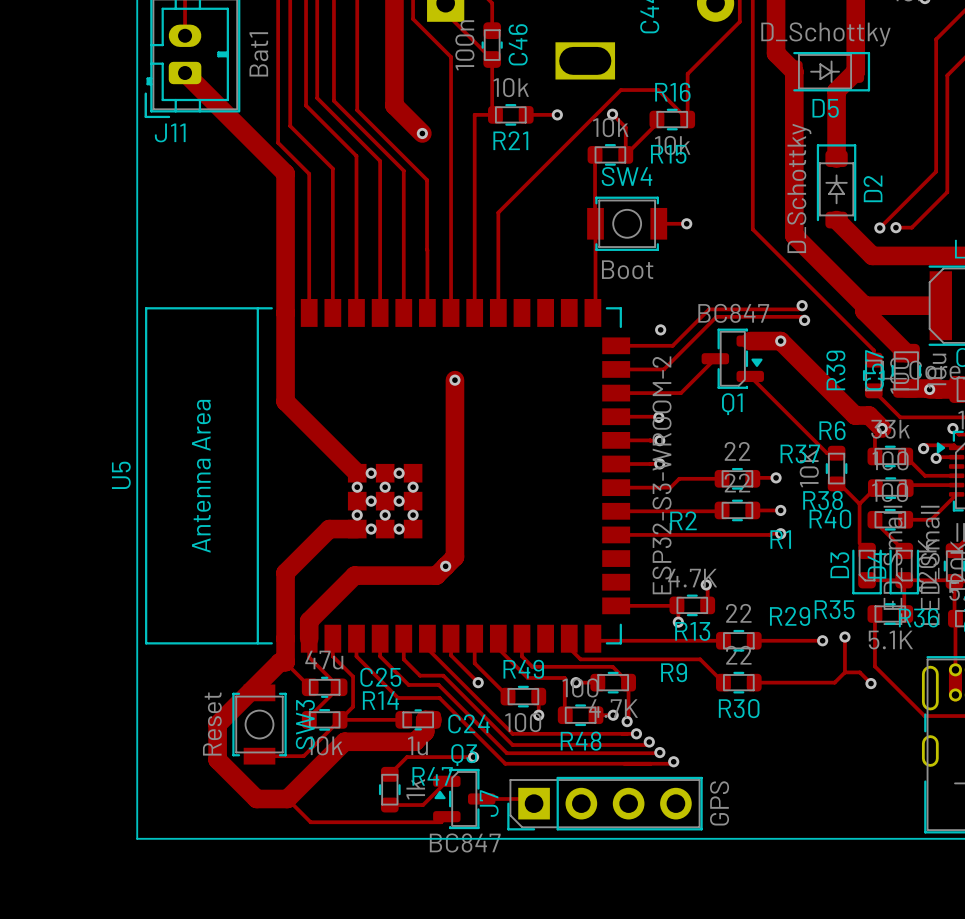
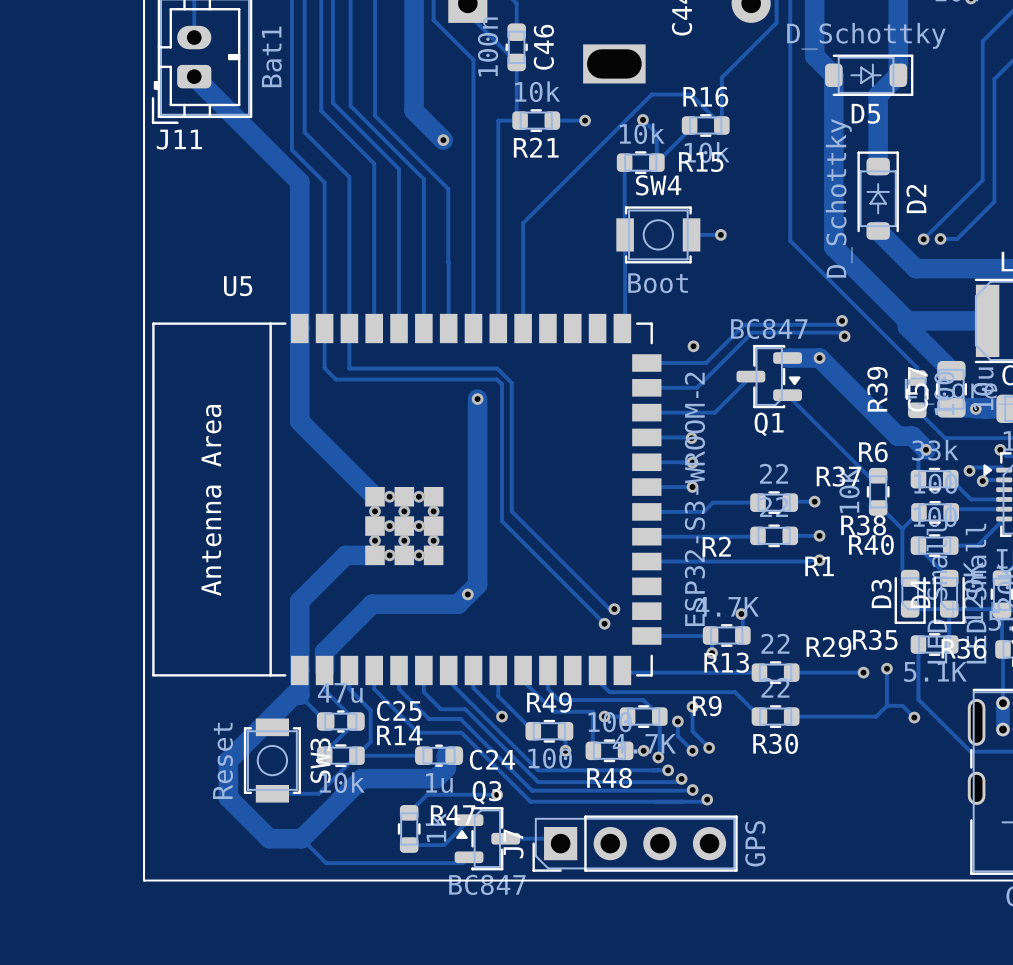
track: none -> (324, 328) (324, 368) (335, 379) (497, 379) (502, 384) (502, 521) (604, 623)
track: none -> (349, 328) (349, 368) (497, 368) (511, 383) (511, 511) (609, 609) (614, 609)
U5 name rotation: 0° (121, 475) -> 90° clockwise (238, 286)
U5 name position: U5 (121, 475) -> U5 (238, 286)
via: none -> (614, 609)
via: none -> (604, 623)
track: none -> (692, 706) (692, 731) (709, 747)
via: none -> (692, 706)
track: none -> (677, 721) (677, 736) (692, 750)
via: none -> (677, 721)
via: none -> (709, 747)
via: none -> (692, 750)

